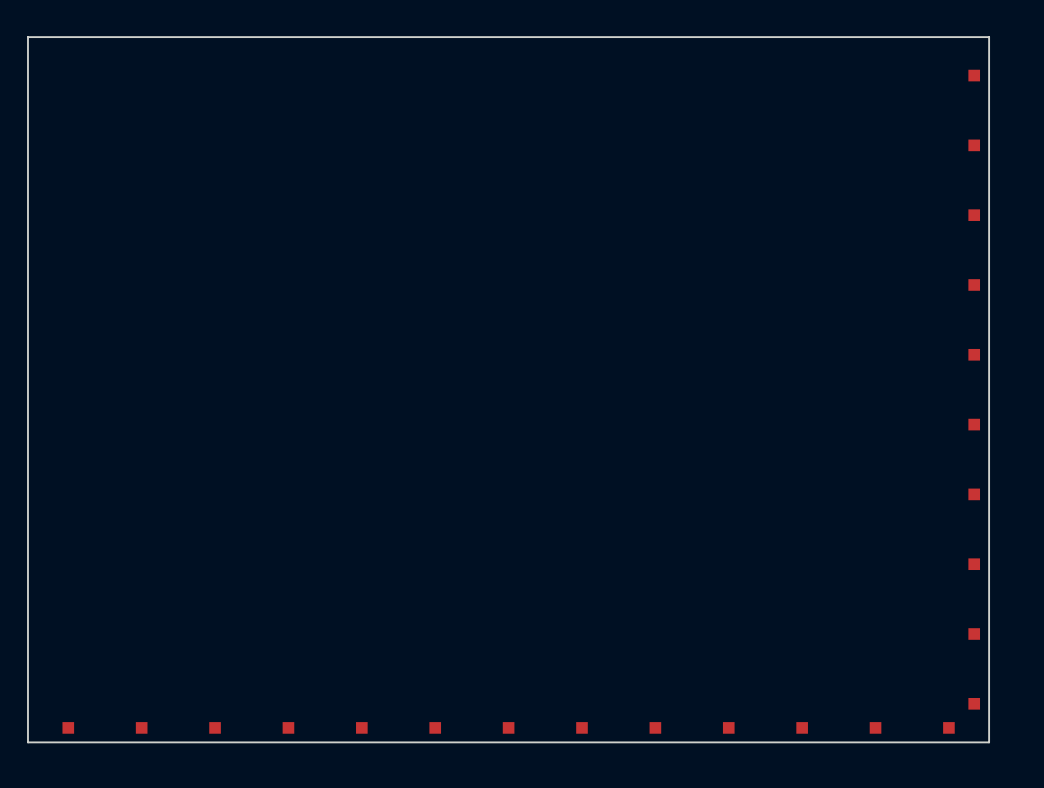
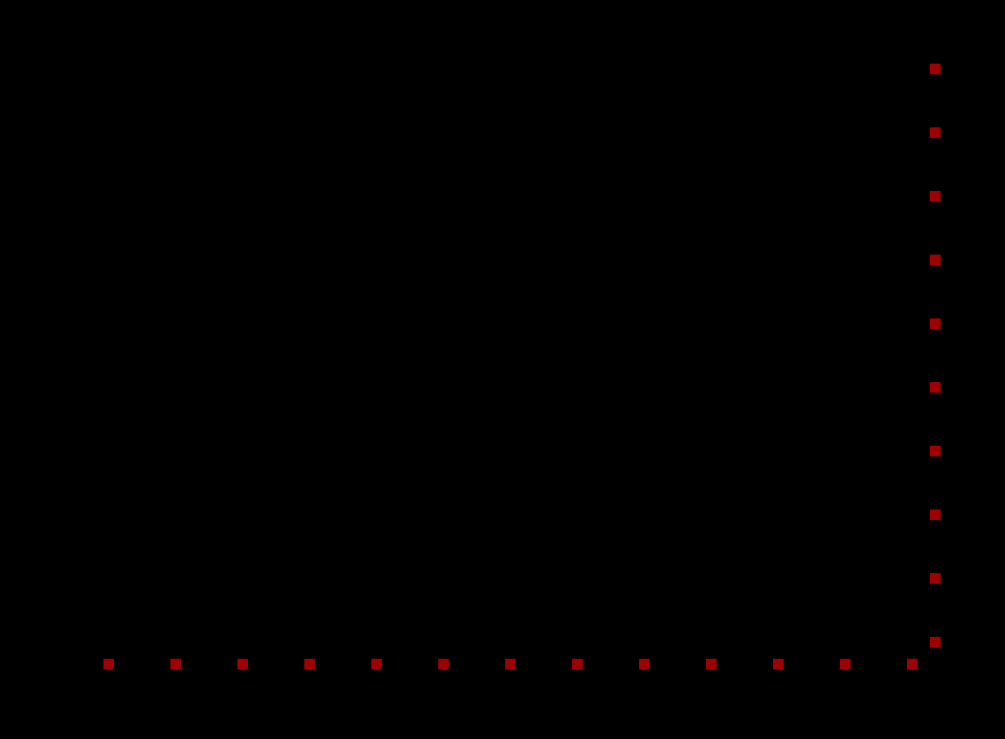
board edge: (27, 37) (989, 37) (989, 742) (27, 742) (27, 37) -> none

